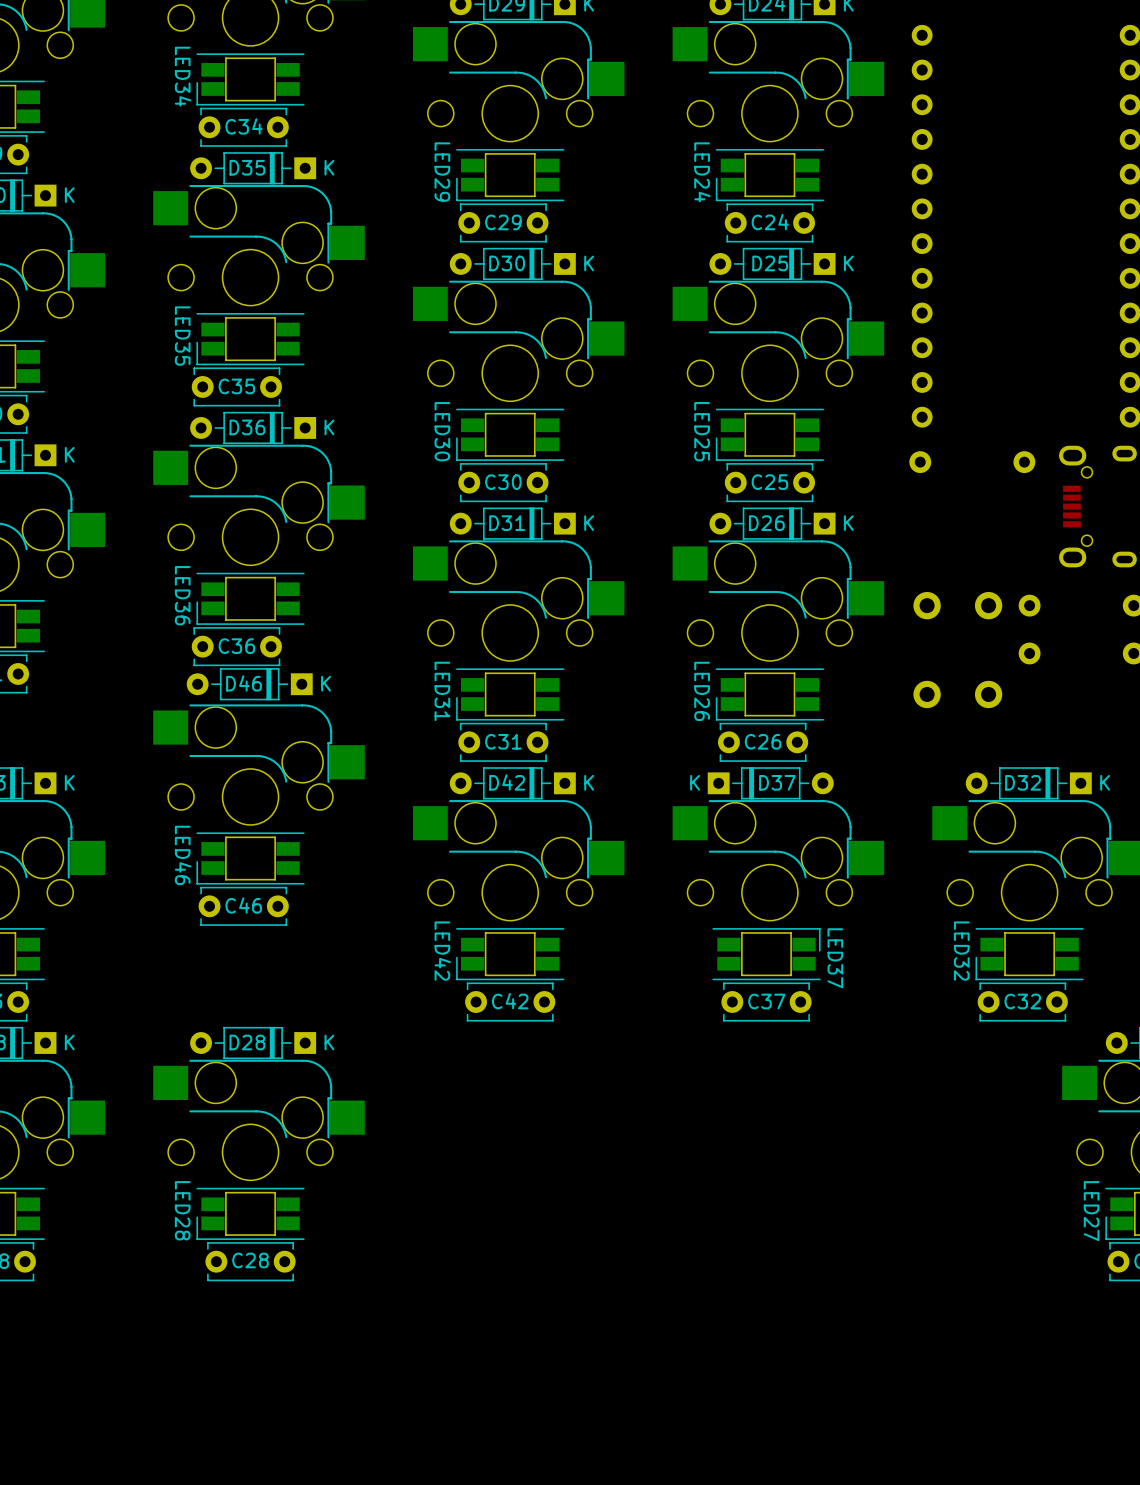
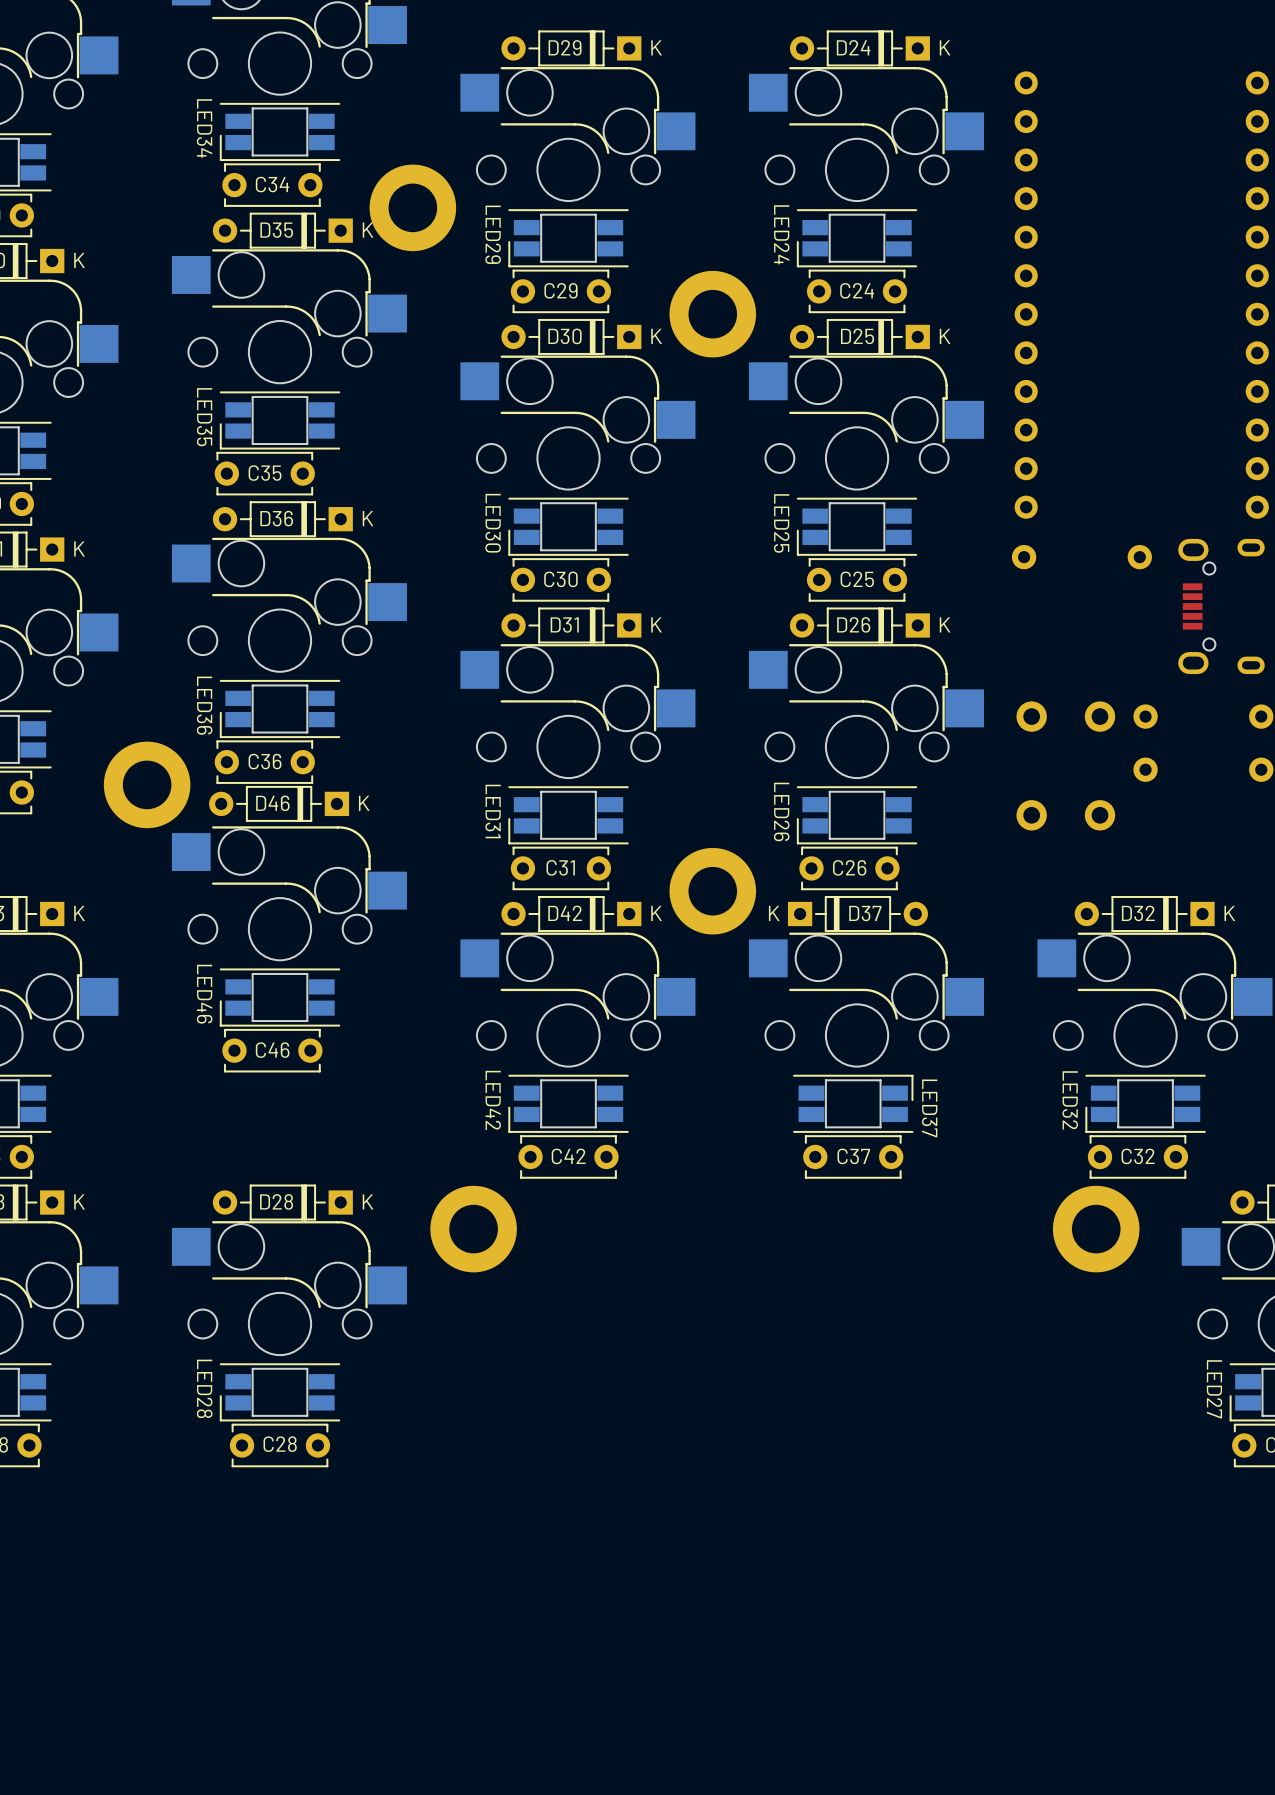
part: none -> (412, 207)
part: none -> (712, 314)
part: none -> (147, 784)
part: none -> (712, 891)
part: none -> (473, 1229)
part: none -> (1096, 1229)

